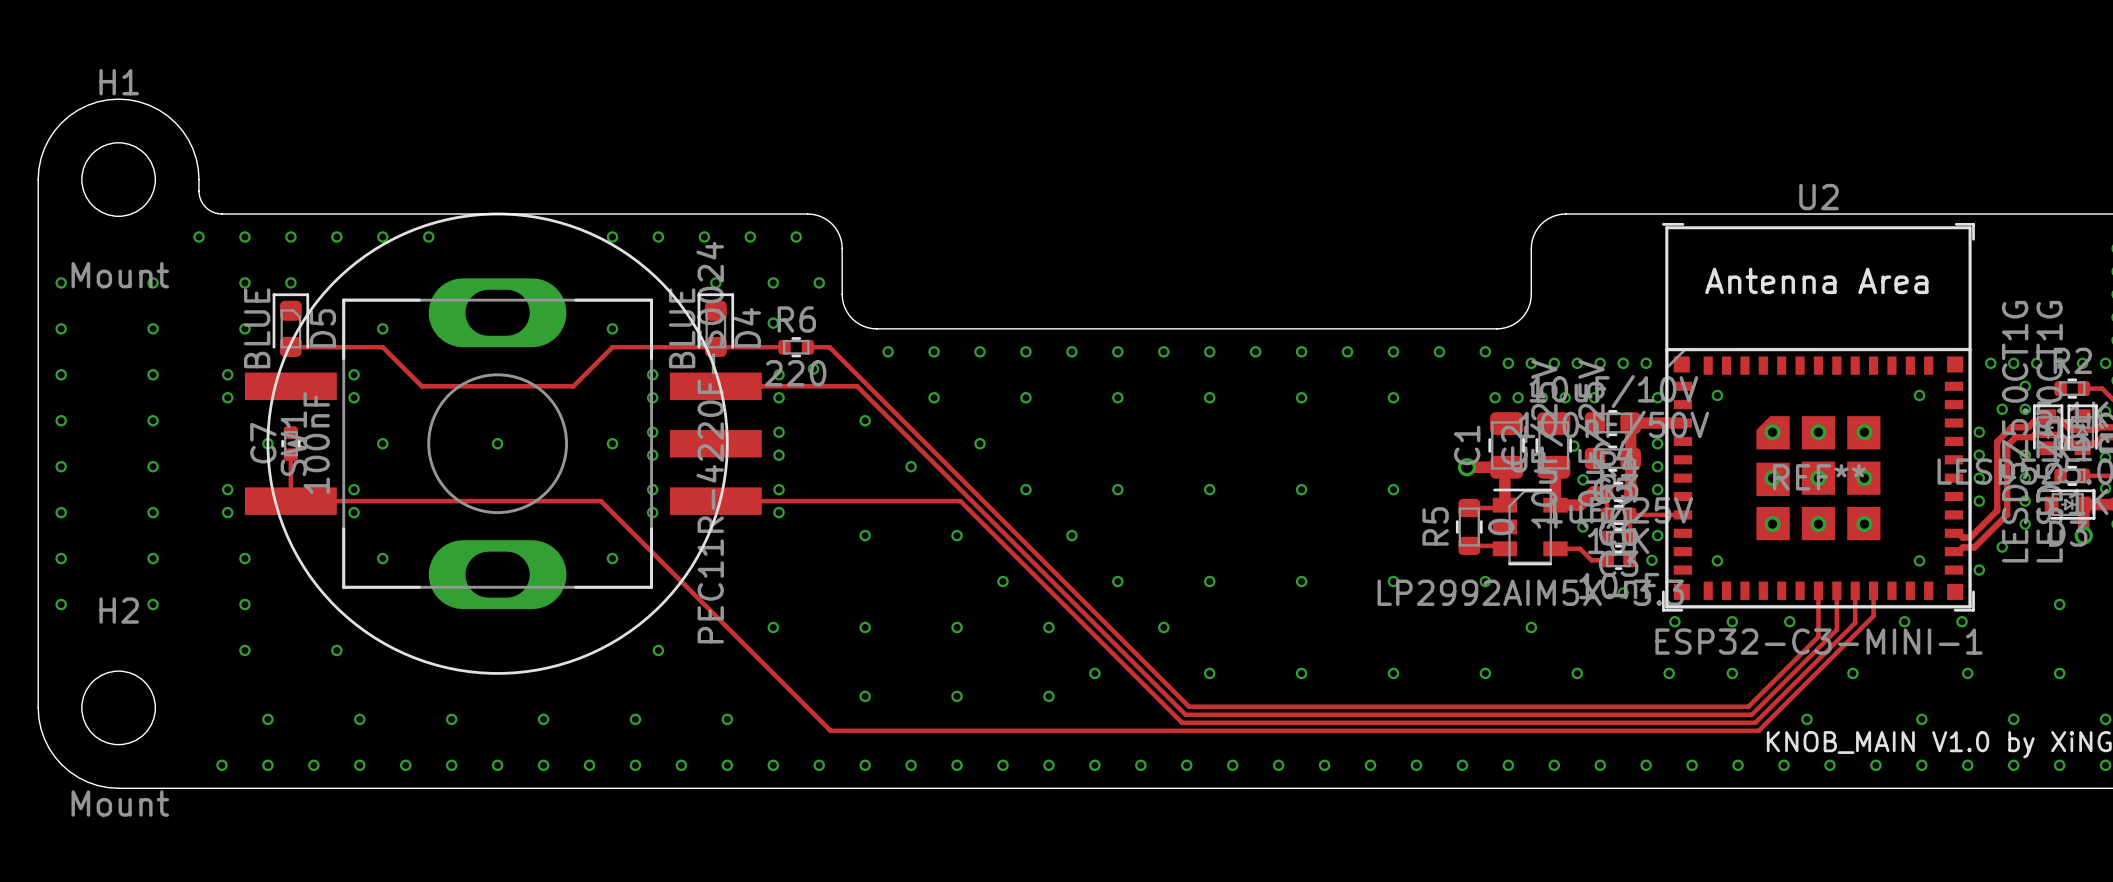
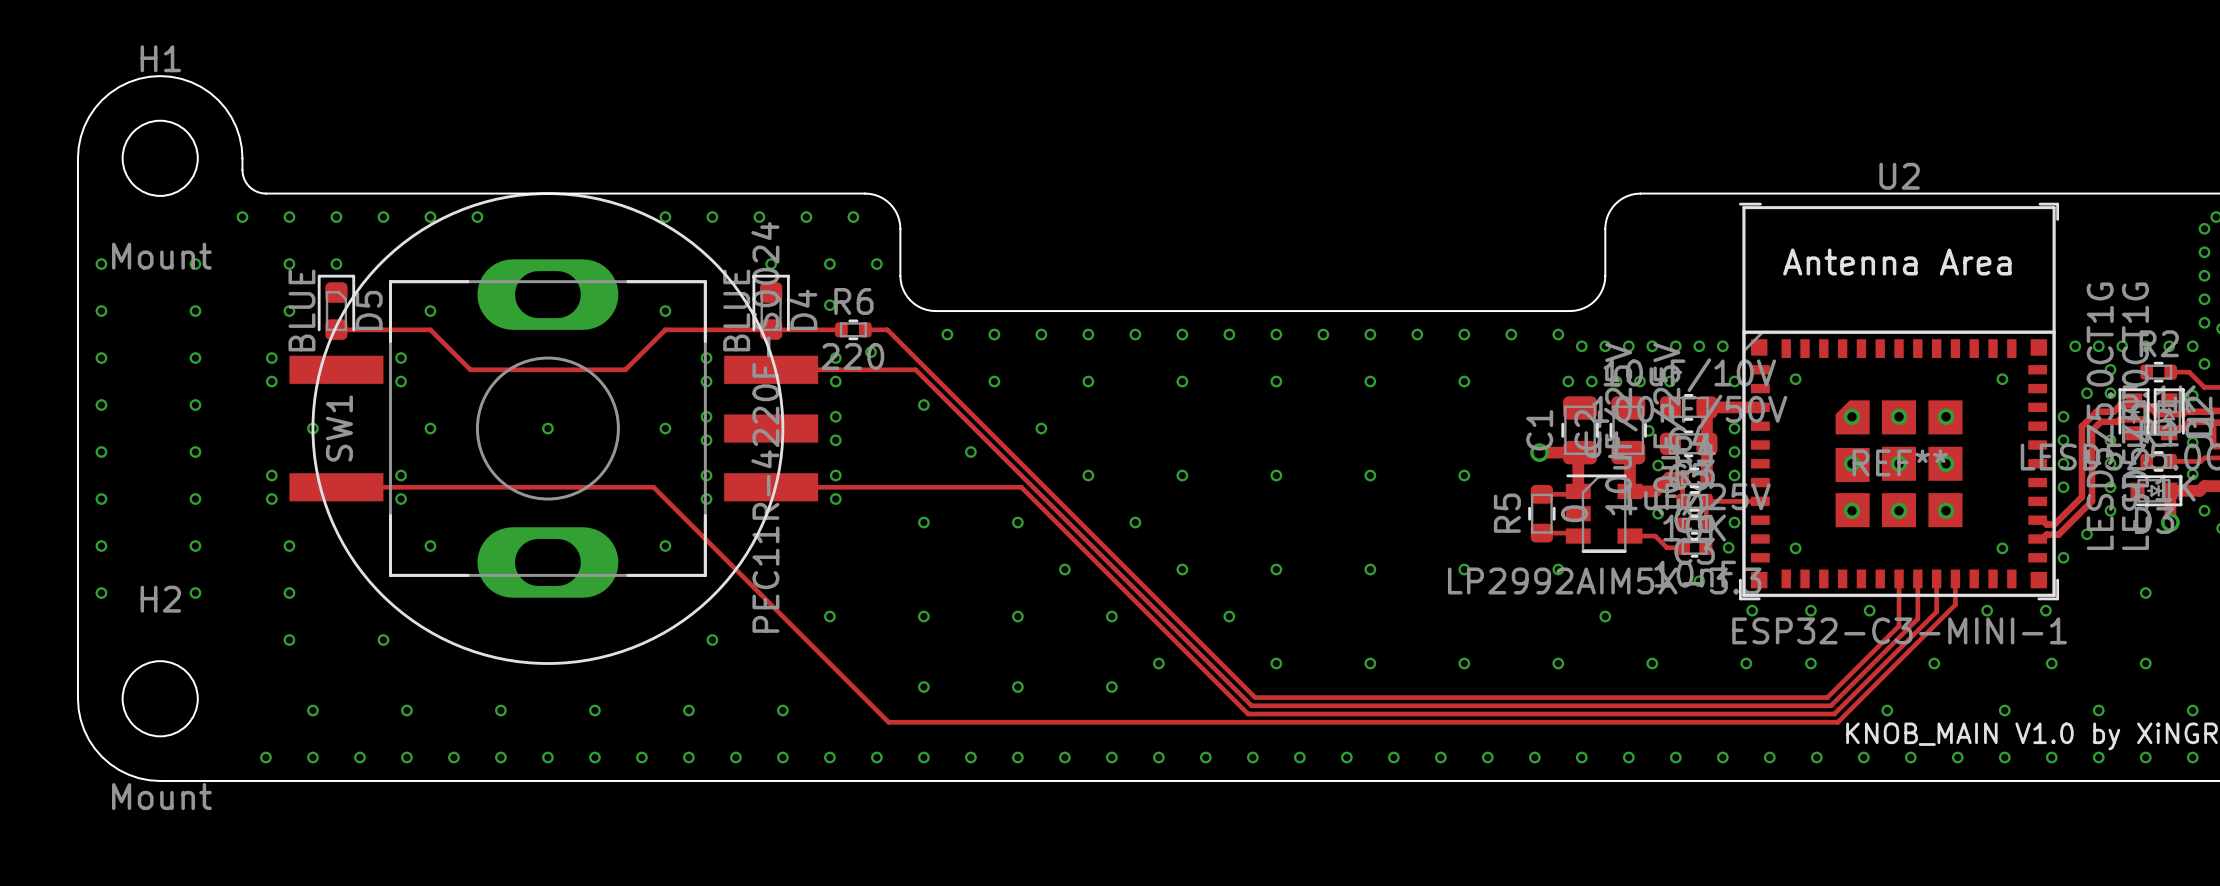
C7: 100nF (290, 443) -> none
track: (290, 454) (290, 501) -> none

